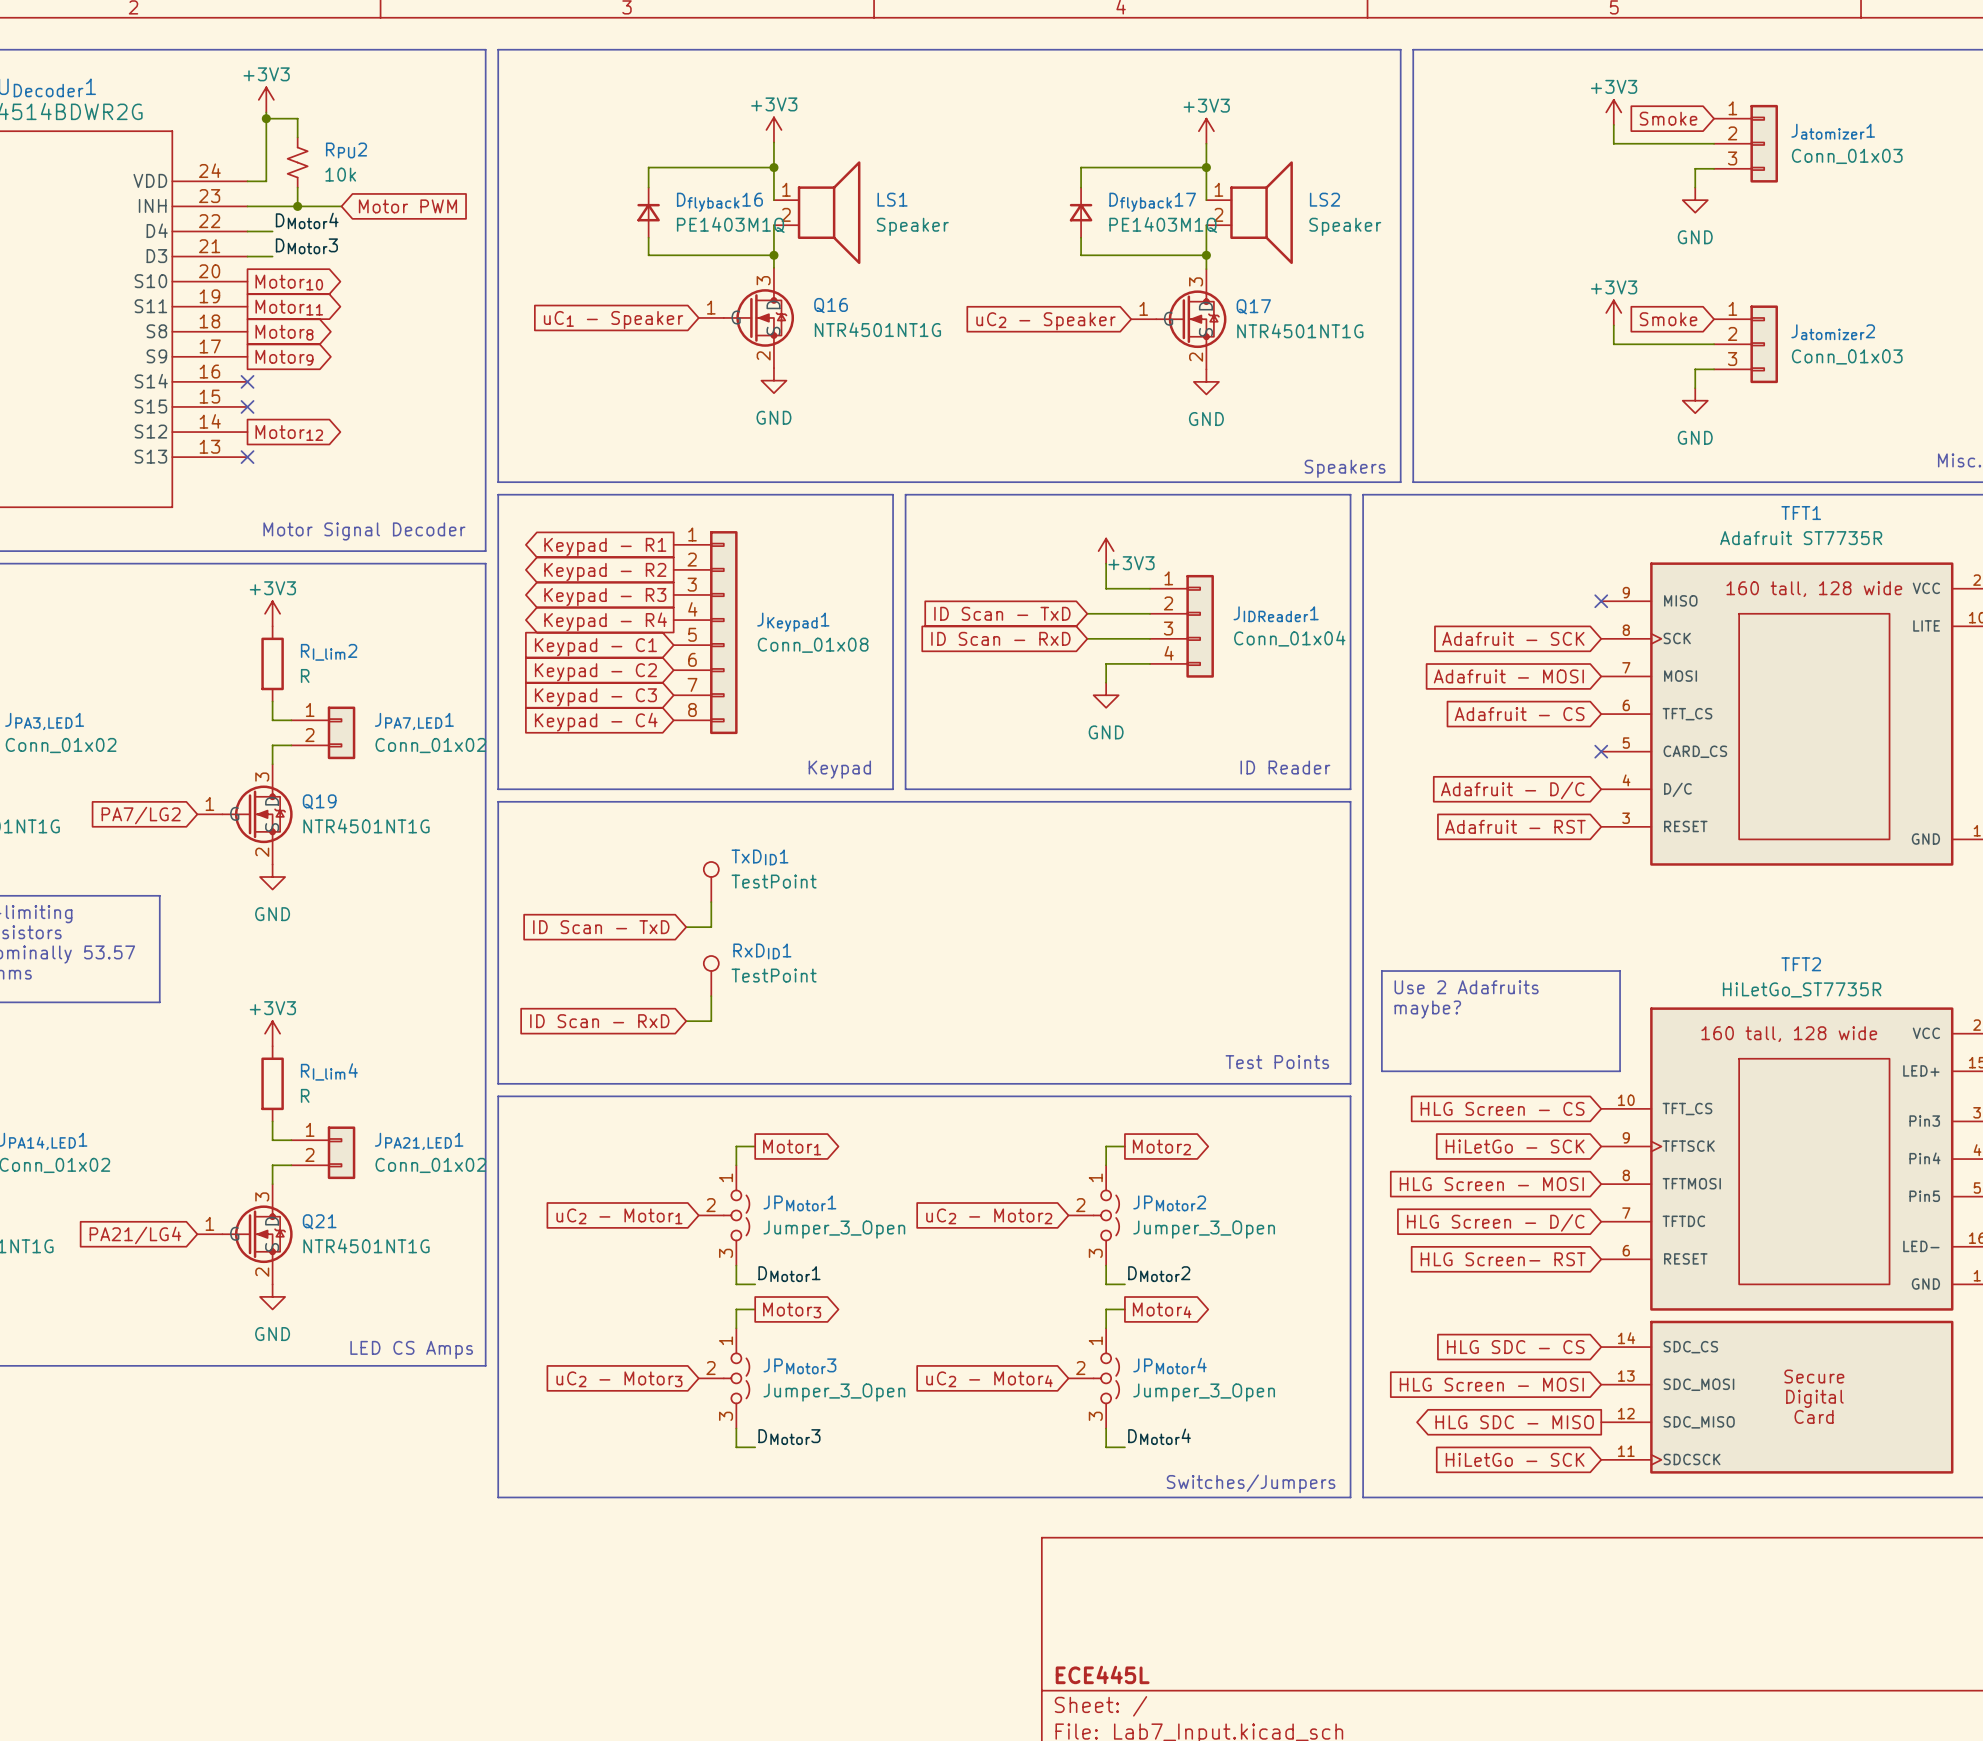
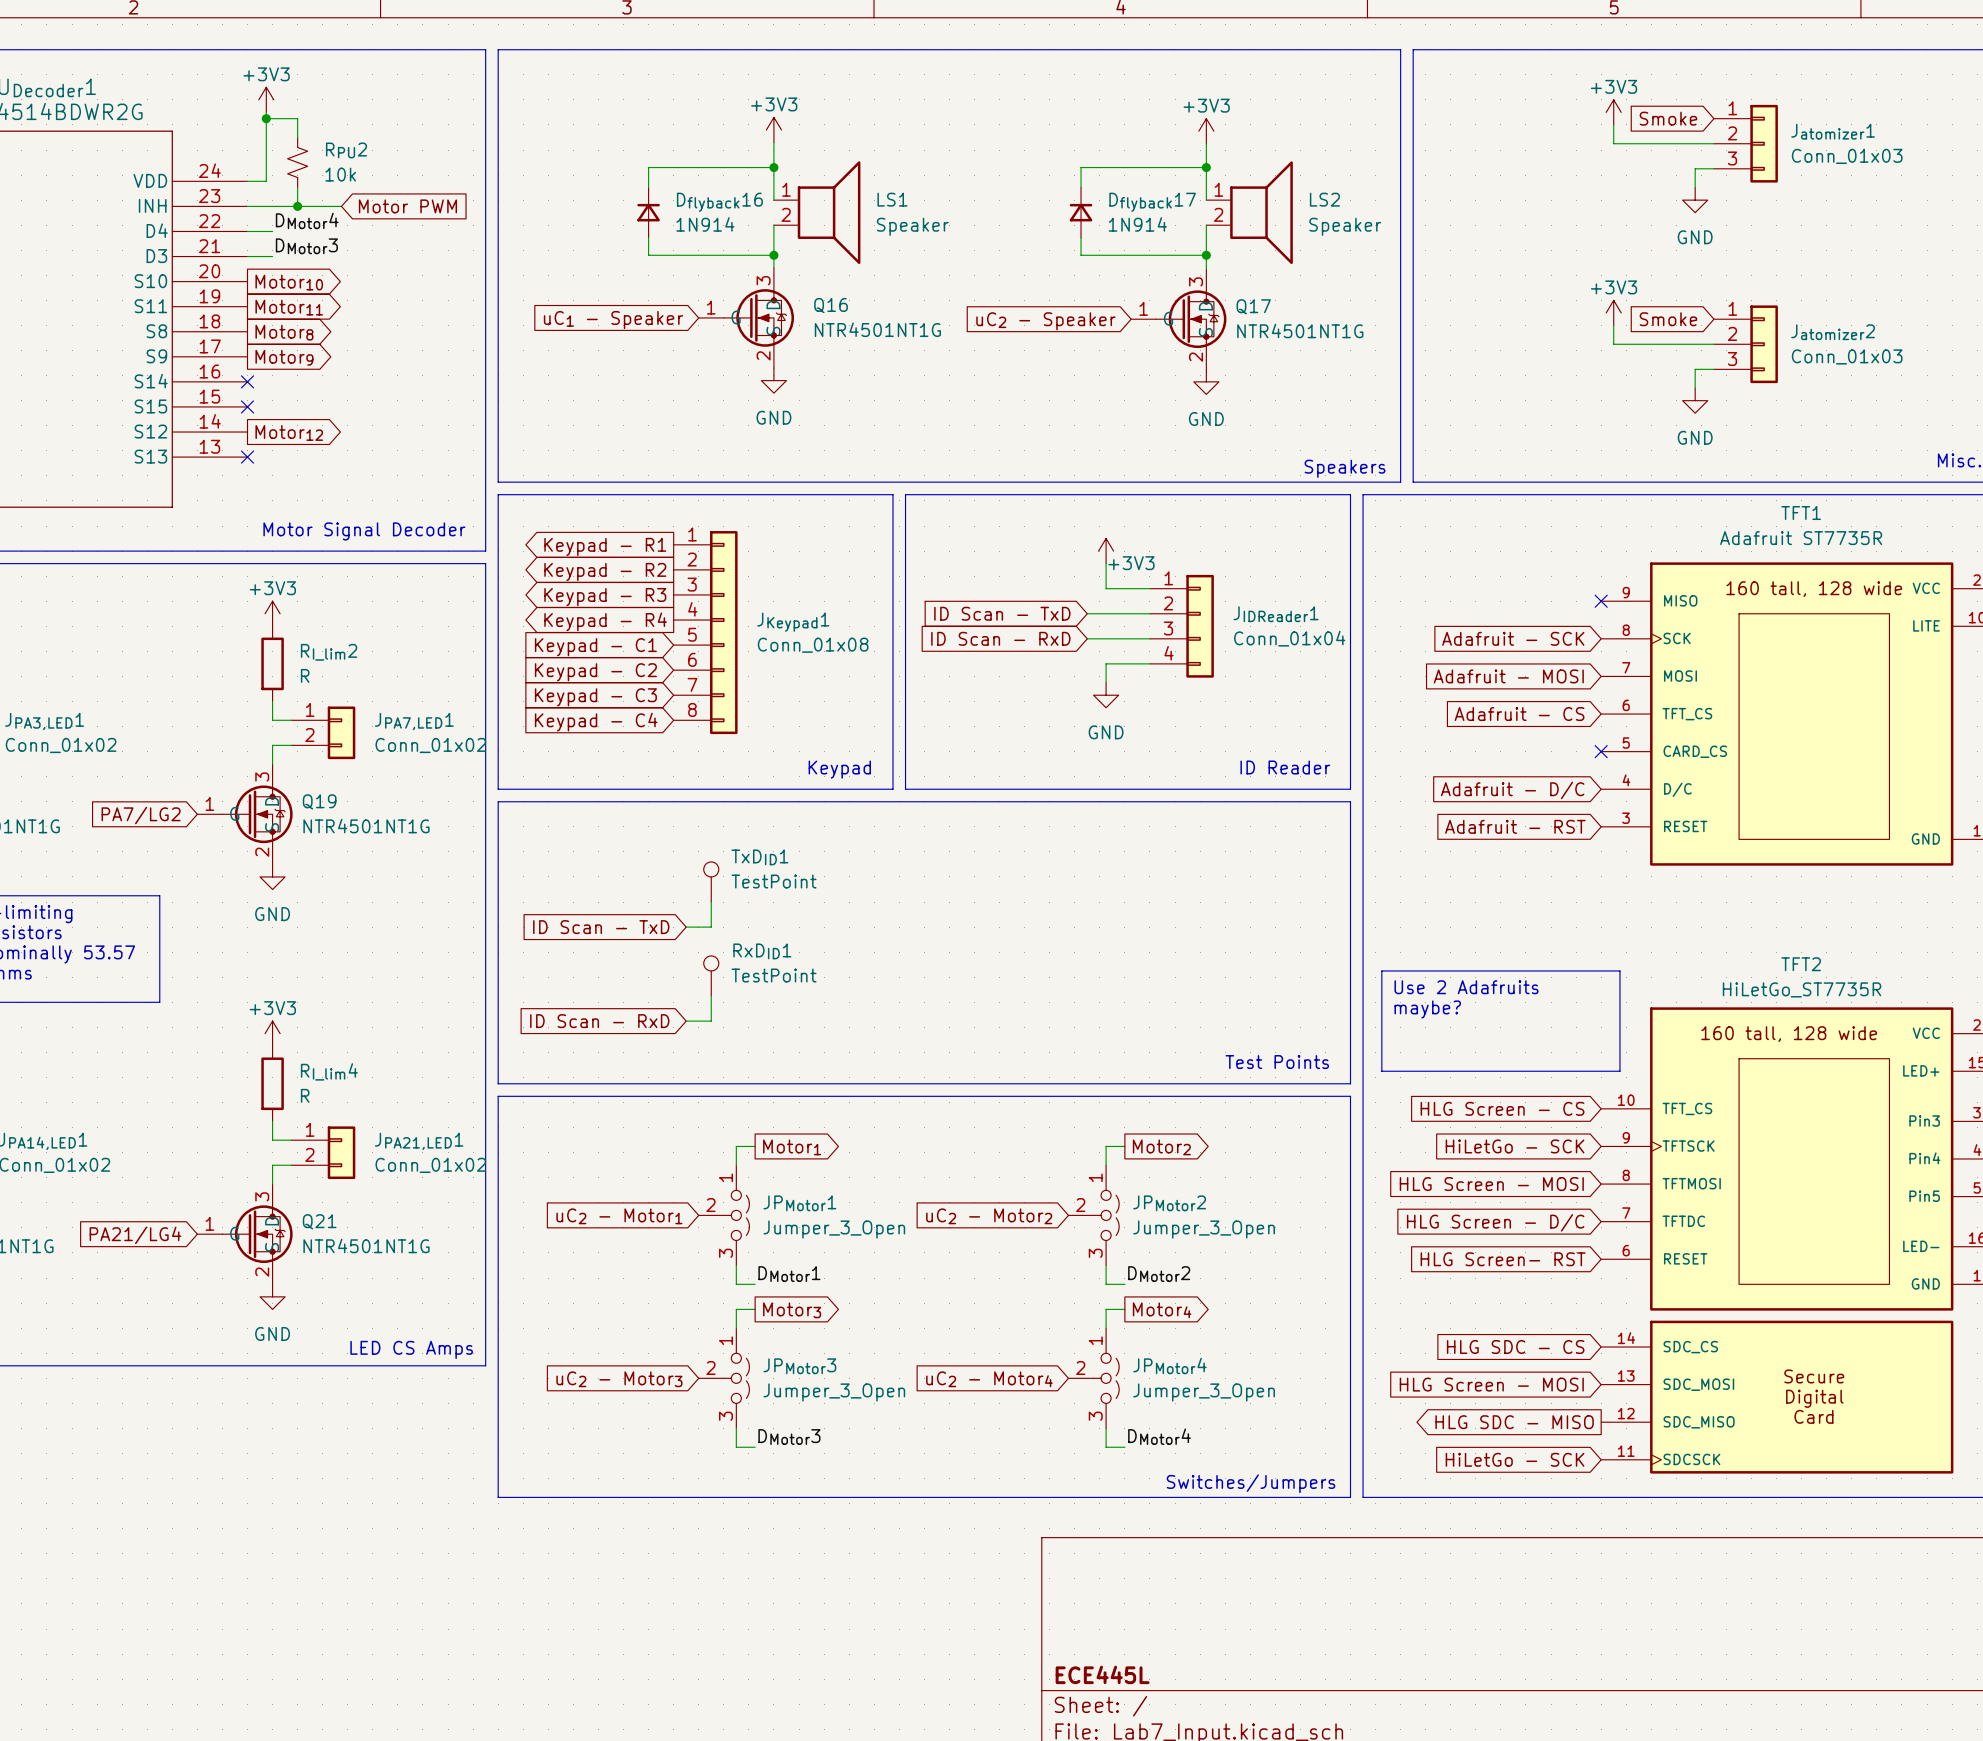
Dflyback16 value: PE1403M1Q (730, 225) -> 1N914 (705, 224)
Dflyback17 value: PE1403M1Q (1163, 225) -> 1N914 (1137, 224)

